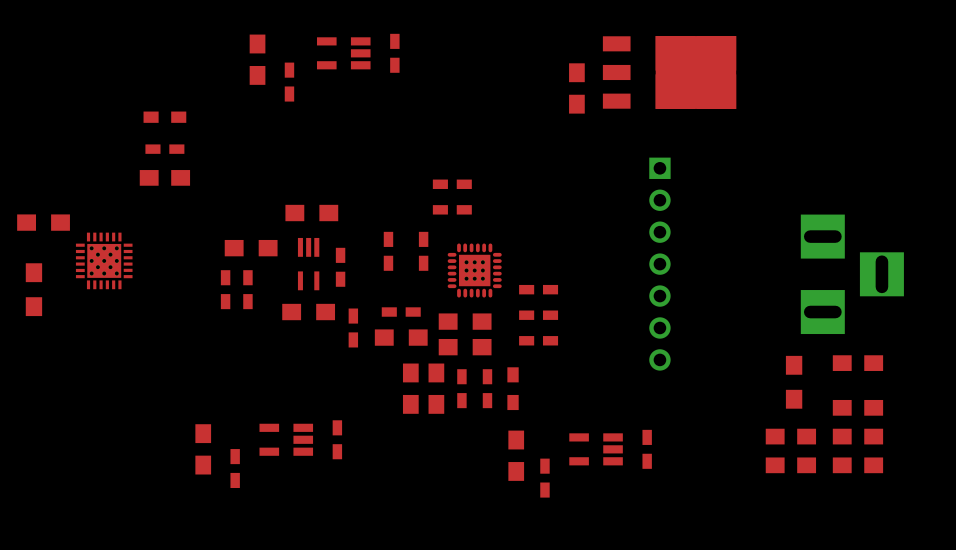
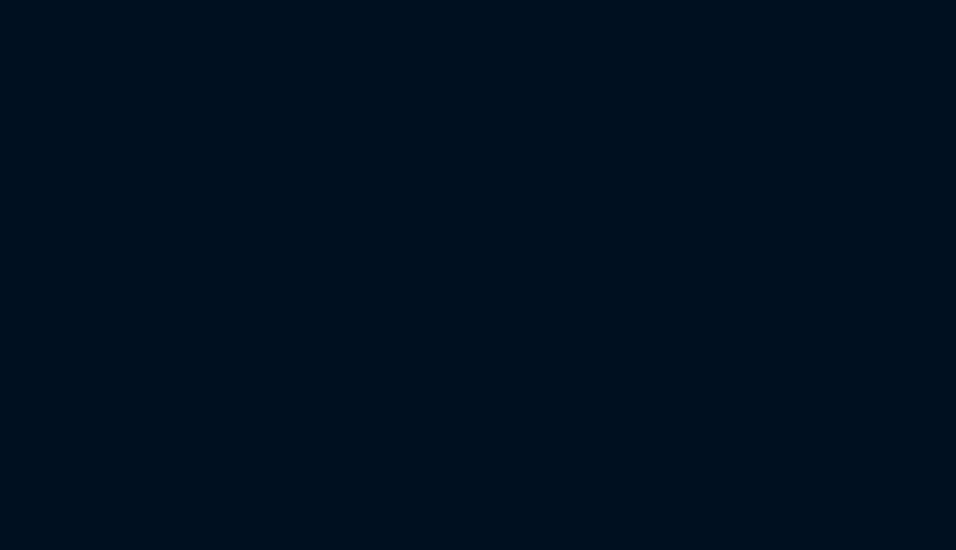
part: (343, 53) -> none
part: (394, 53) -> none
part: (257, 59) -> none
part: (669, 72) -> none
part: (289, 82) -> none
part: (576, 88) -> none
part: (164, 117) -> none
part: (164, 149) -> none
part: (164, 177) -> none
part: (452, 184) -> none
part: (452, 209) -> none
part: (311, 213) -> none
part: (43, 222) -> none
part: (251, 248) -> none
part: (388, 251) -> none
part: (423, 251) -> none
part: (104, 260) -> none
part: (308, 264) -> none
part: (659, 264) -> none
part: (340, 267) -> none
part: (474, 270) -> none
part: (852, 274) -> none
part: (33, 289) -> none
part: (225, 289) -> none
part: (247, 289) -> none
part: (538, 289) -> none
part: (308, 312) -> none
part: (401, 312) -> none
part: (538, 315) -> none
part: (465, 321) -> none
part: (353, 327) -> none
part: (401, 337) -> none
part: (538, 340) -> none
part: (465, 347) -> none
part: (857, 363) -> none
part: (794, 382) -> none
part: (410, 388) -> none
part: (436, 388) -> none
part: (461, 388) -> none
part: (487, 388) -> none
part: (513, 388) -> none
part: (857, 407) -> none
part: (790, 436) -> none
part: (857, 436) -> none
part: (286, 439) -> none
part: (337, 439) -> none
part: (203, 449) -> none
part: (596, 449) -> none
part: (647, 449) -> none
part: (516, 455) -> none
part: (790, 465) -> none
part: (857, 465) -> none
part: (235, 468) -> none
part: (544, 478) -> none

